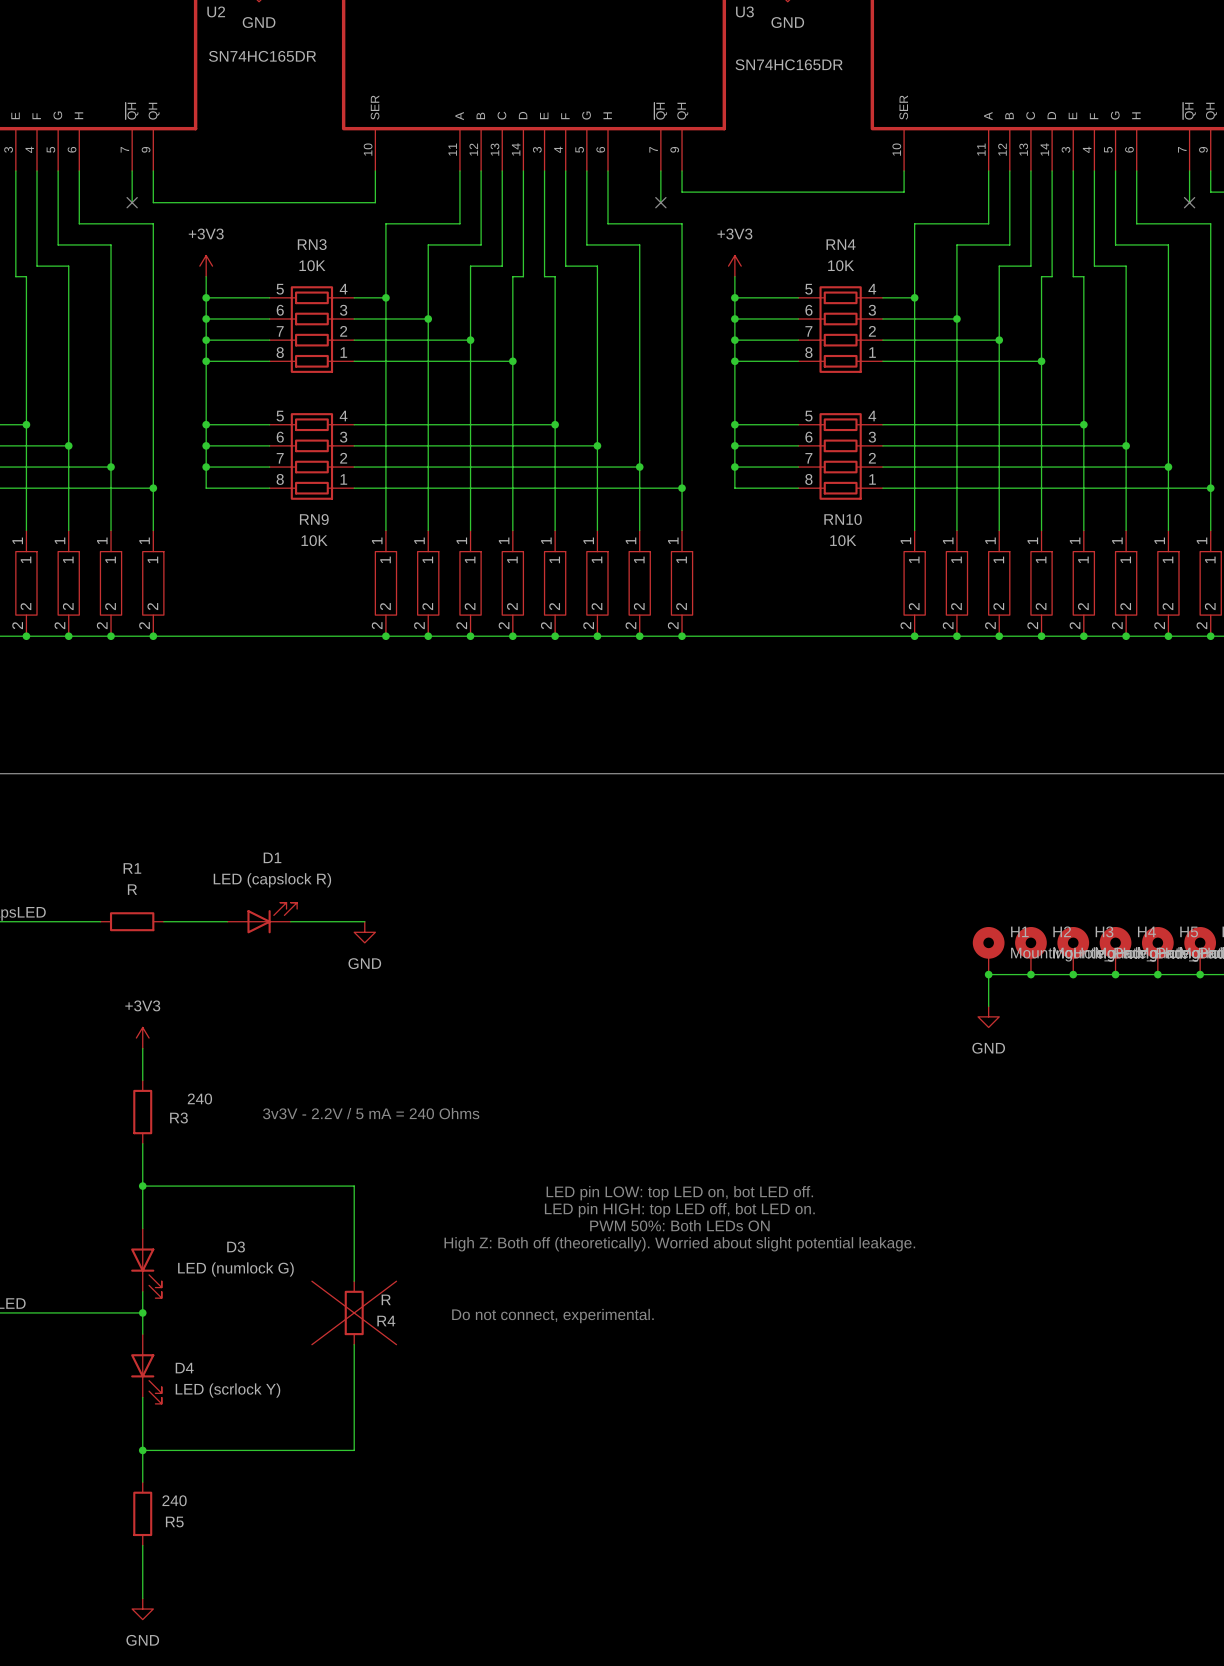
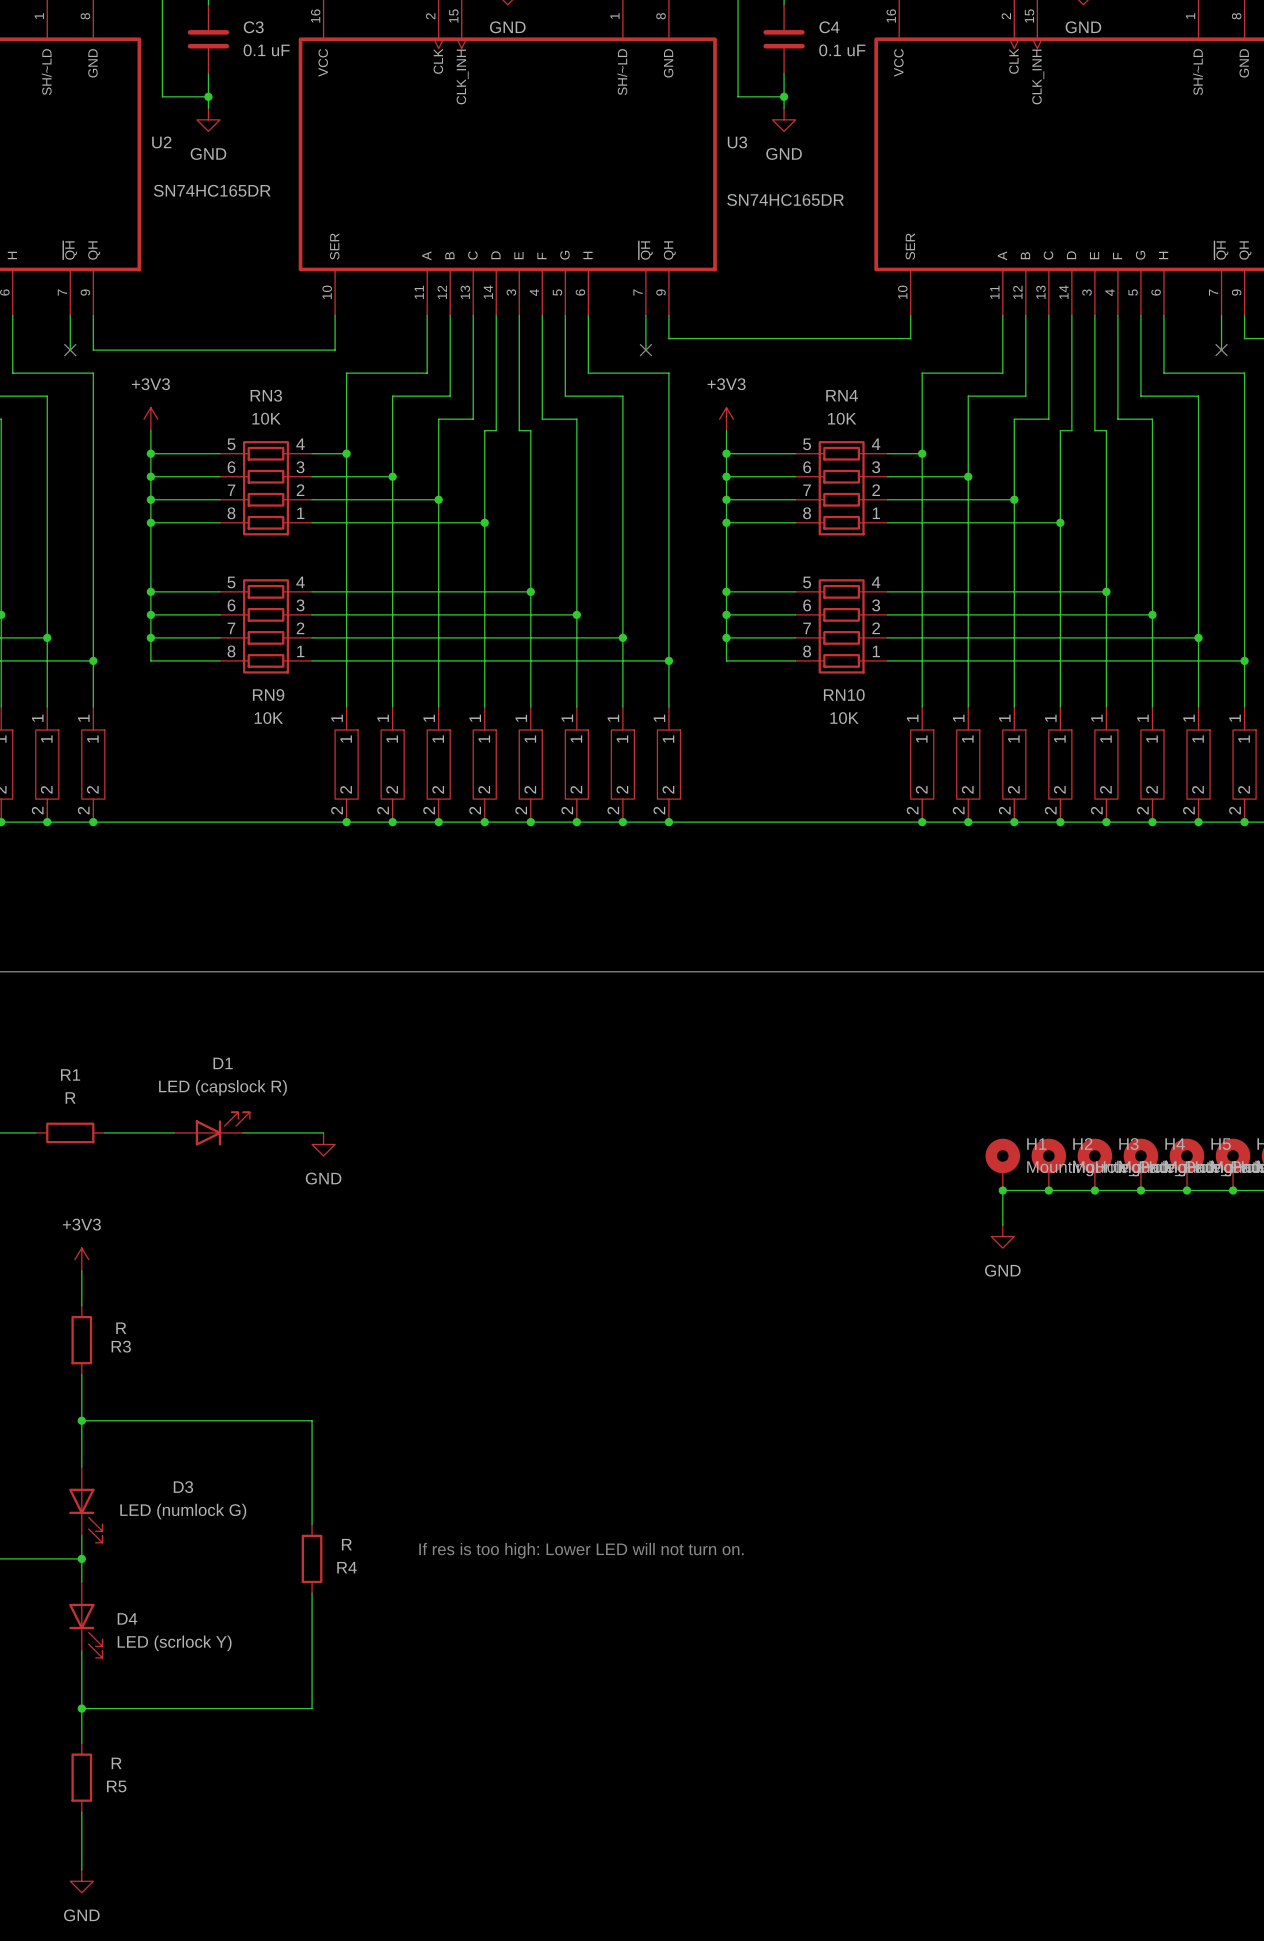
R3 value: 240 (199, 1098) -> R (121, 1328)
text: 3v3V - 2.2V / 5 mA = 240 Ohms (371, 1113) -> none
text: LED pin LOW: top LED on, bot LED off. (679, 1193) -> none
text: LED pin HIGH: top LED off, bot LED on. (679, 1210) -> none
text: PWM 50%: Both LEDs ON (679, 1225) -> none
text: High Z: Both off (theoretically). Worried about slight potential leakage. (679, 1244) -> none
R4 symbol: [311, 1281, 397, 1345] -> [301, 1524, 323, 1594]
text: none -> If res is too high: Lower LED will not turn on. (581, 1550)
text: Do not connect, experimental. (552, 1316) -> none
R5 value: 240 (174, 1500) -> R (116, 1763)

